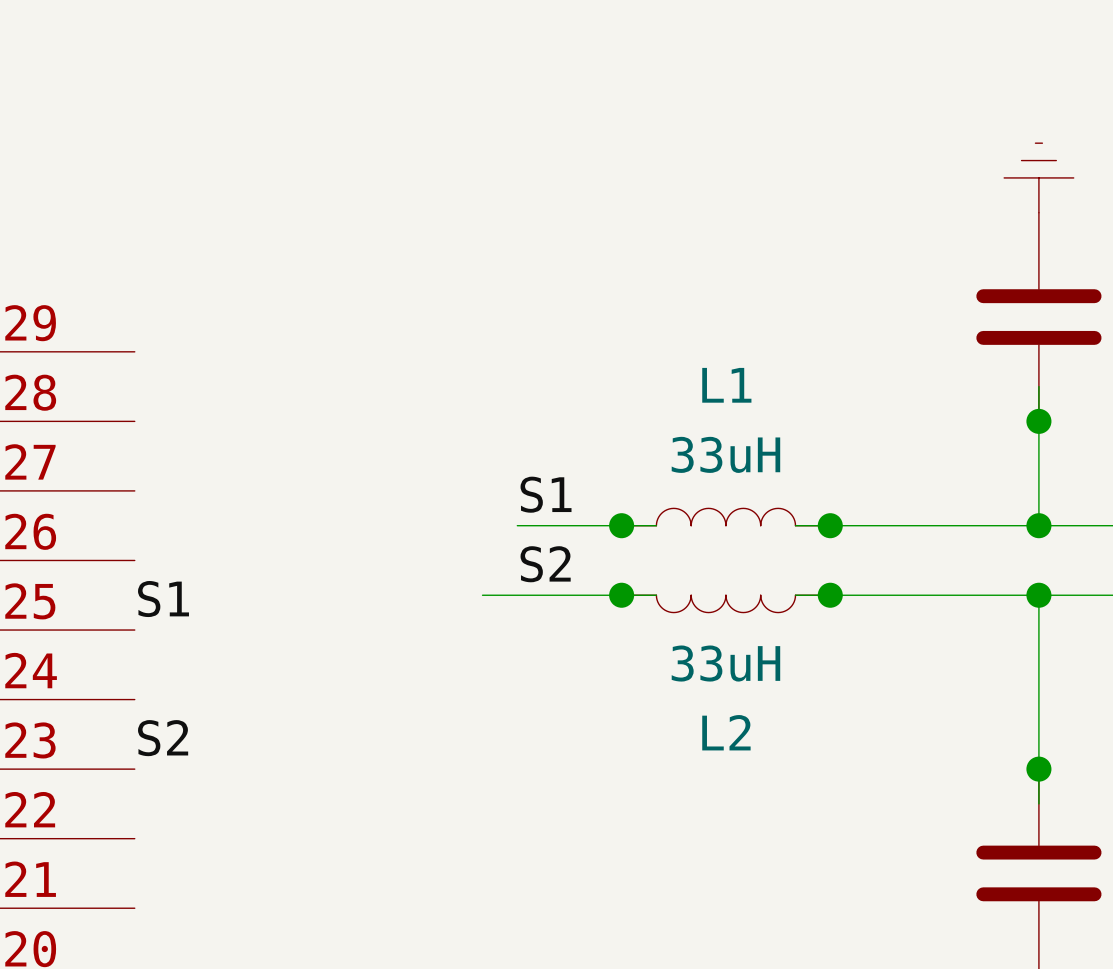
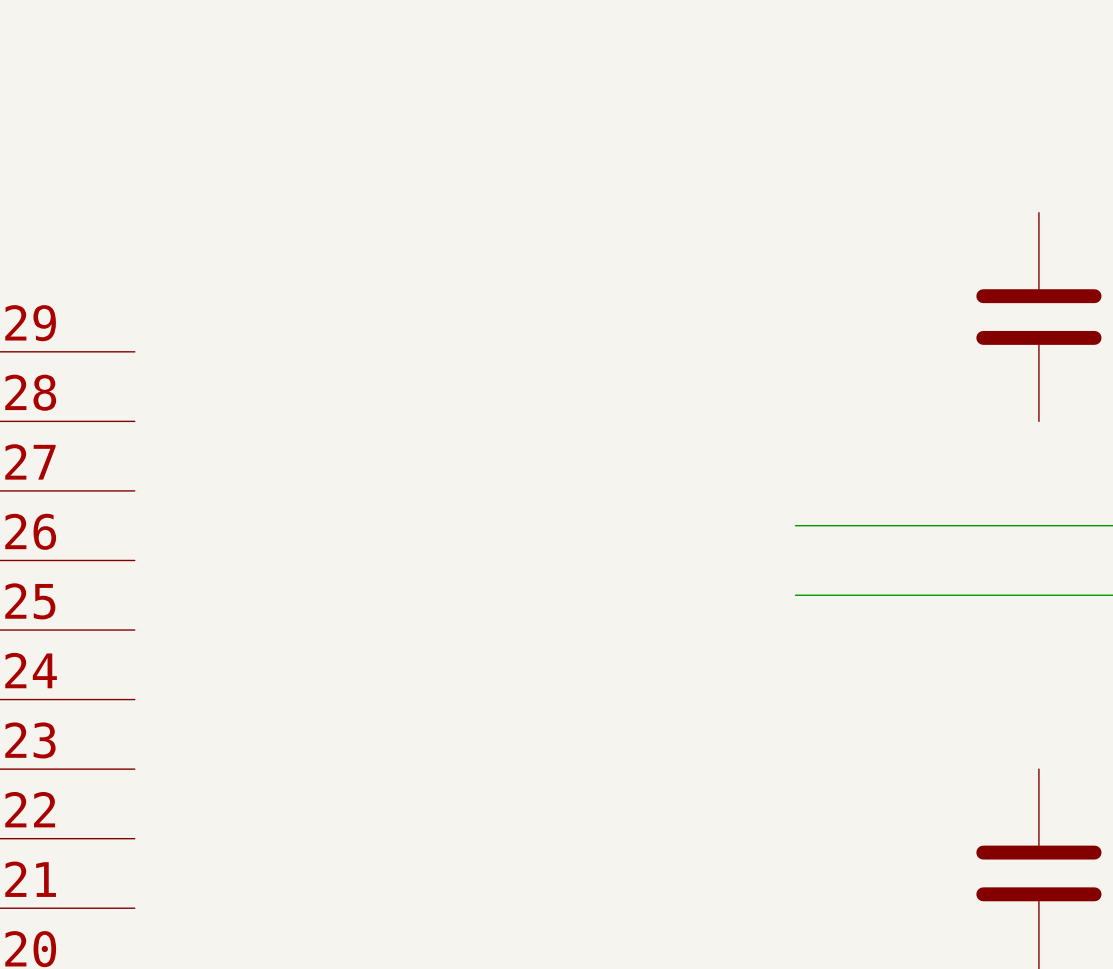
power symbol: (1038, 177) -> none
wire: (1038, 386) (1038, 525) -> none
junction: (1038, 421) -> none
label: S1 (546, 494) -> none
L1: 33uH (725, 517) -> none
wire: (517, 525) (656, 525) -> none
junction: (621, 525) -> none
junction: (830, 525) -> none
junction: (1038, 525) -> none
label: S2 (545, 564) -> none
wire: (482, 595) (656, 595) -> none
junction: (621, 595) -> none
junction: (830, 595) -> none
wire: (1038, 595) (1038, 803) -> none
junction: (1038, 595) -> none
label: S1 (163, 599) -> none
L2: 33uH (725, 603) -> none
label: S2 (163, 738) -> none
junction: (1038, 769) -> none

